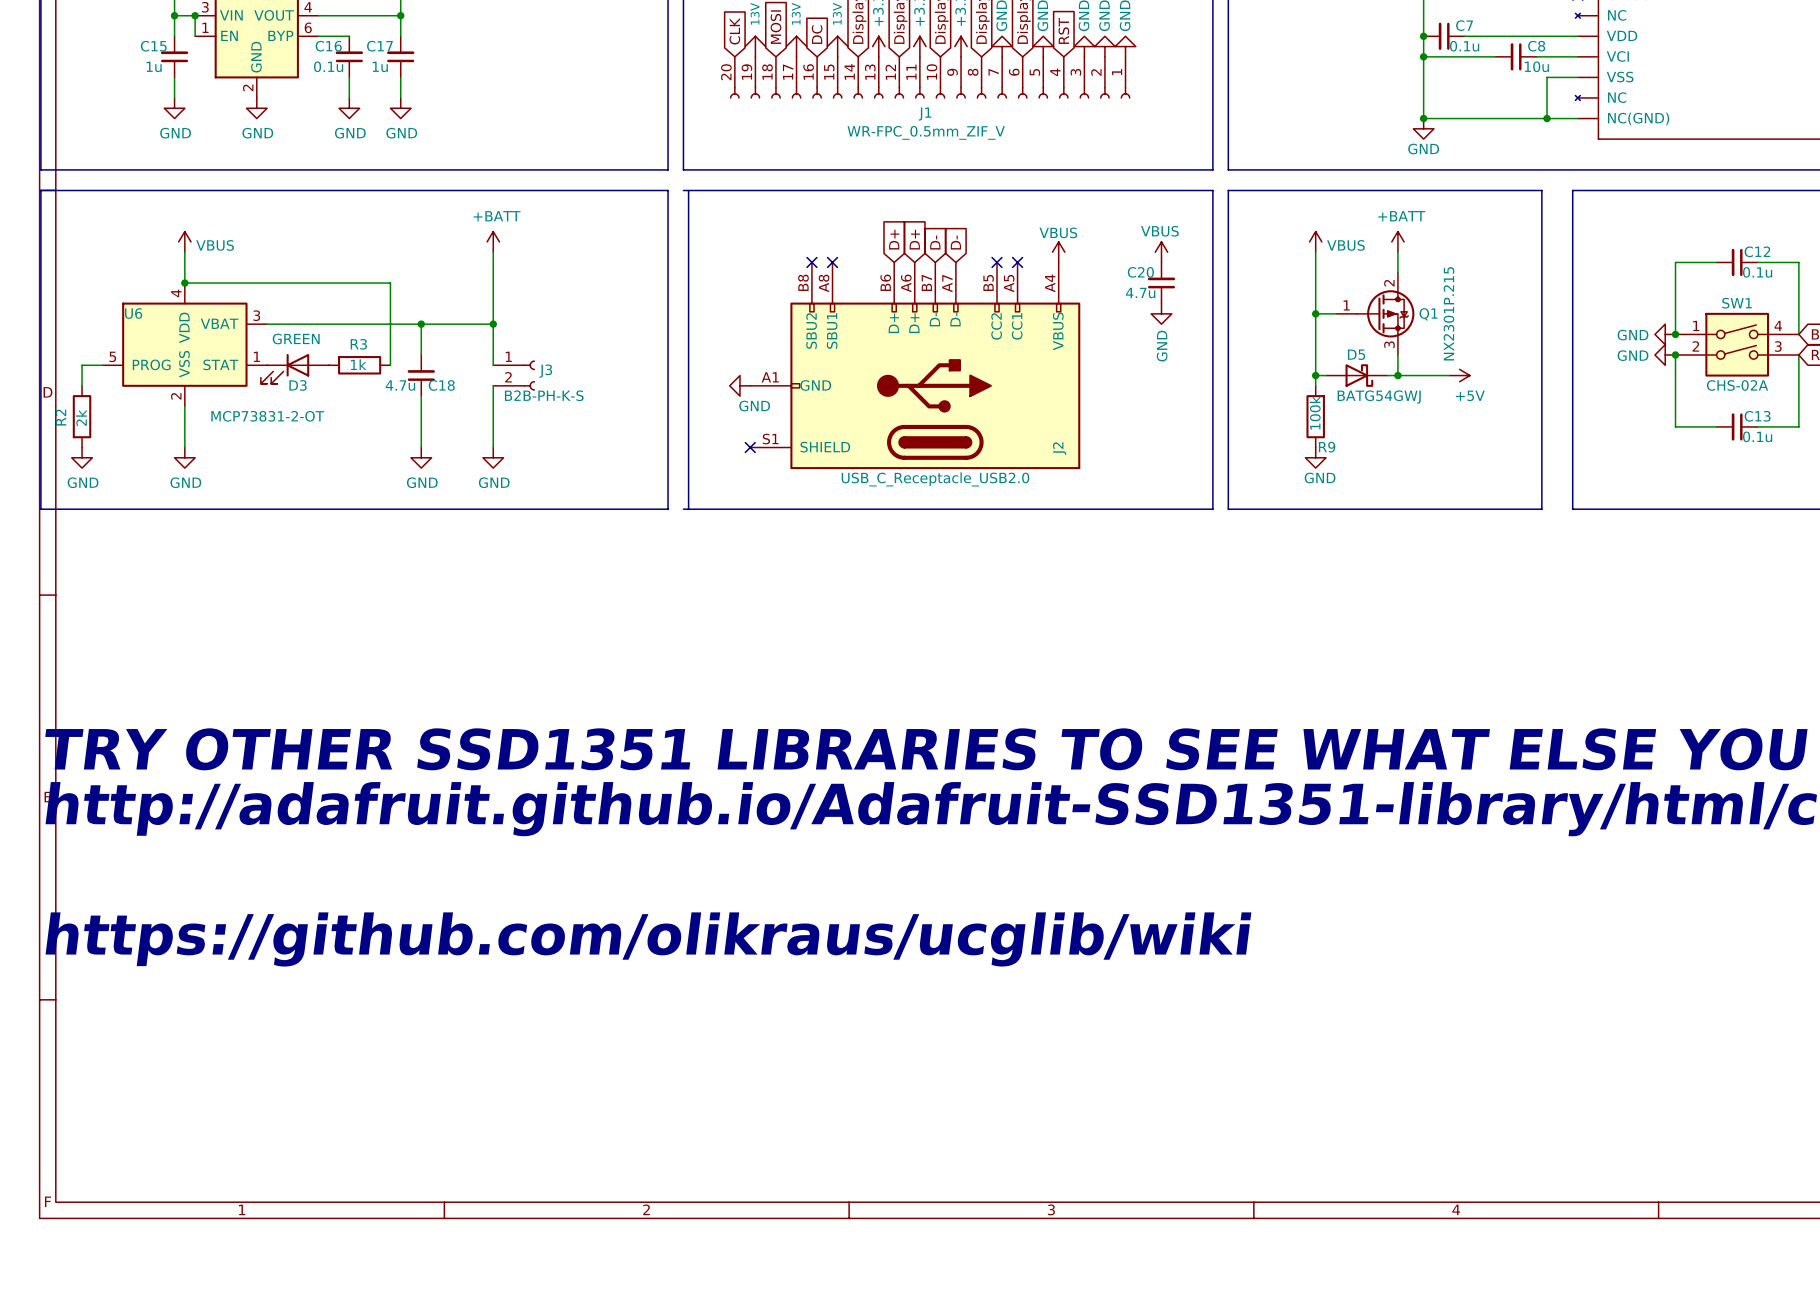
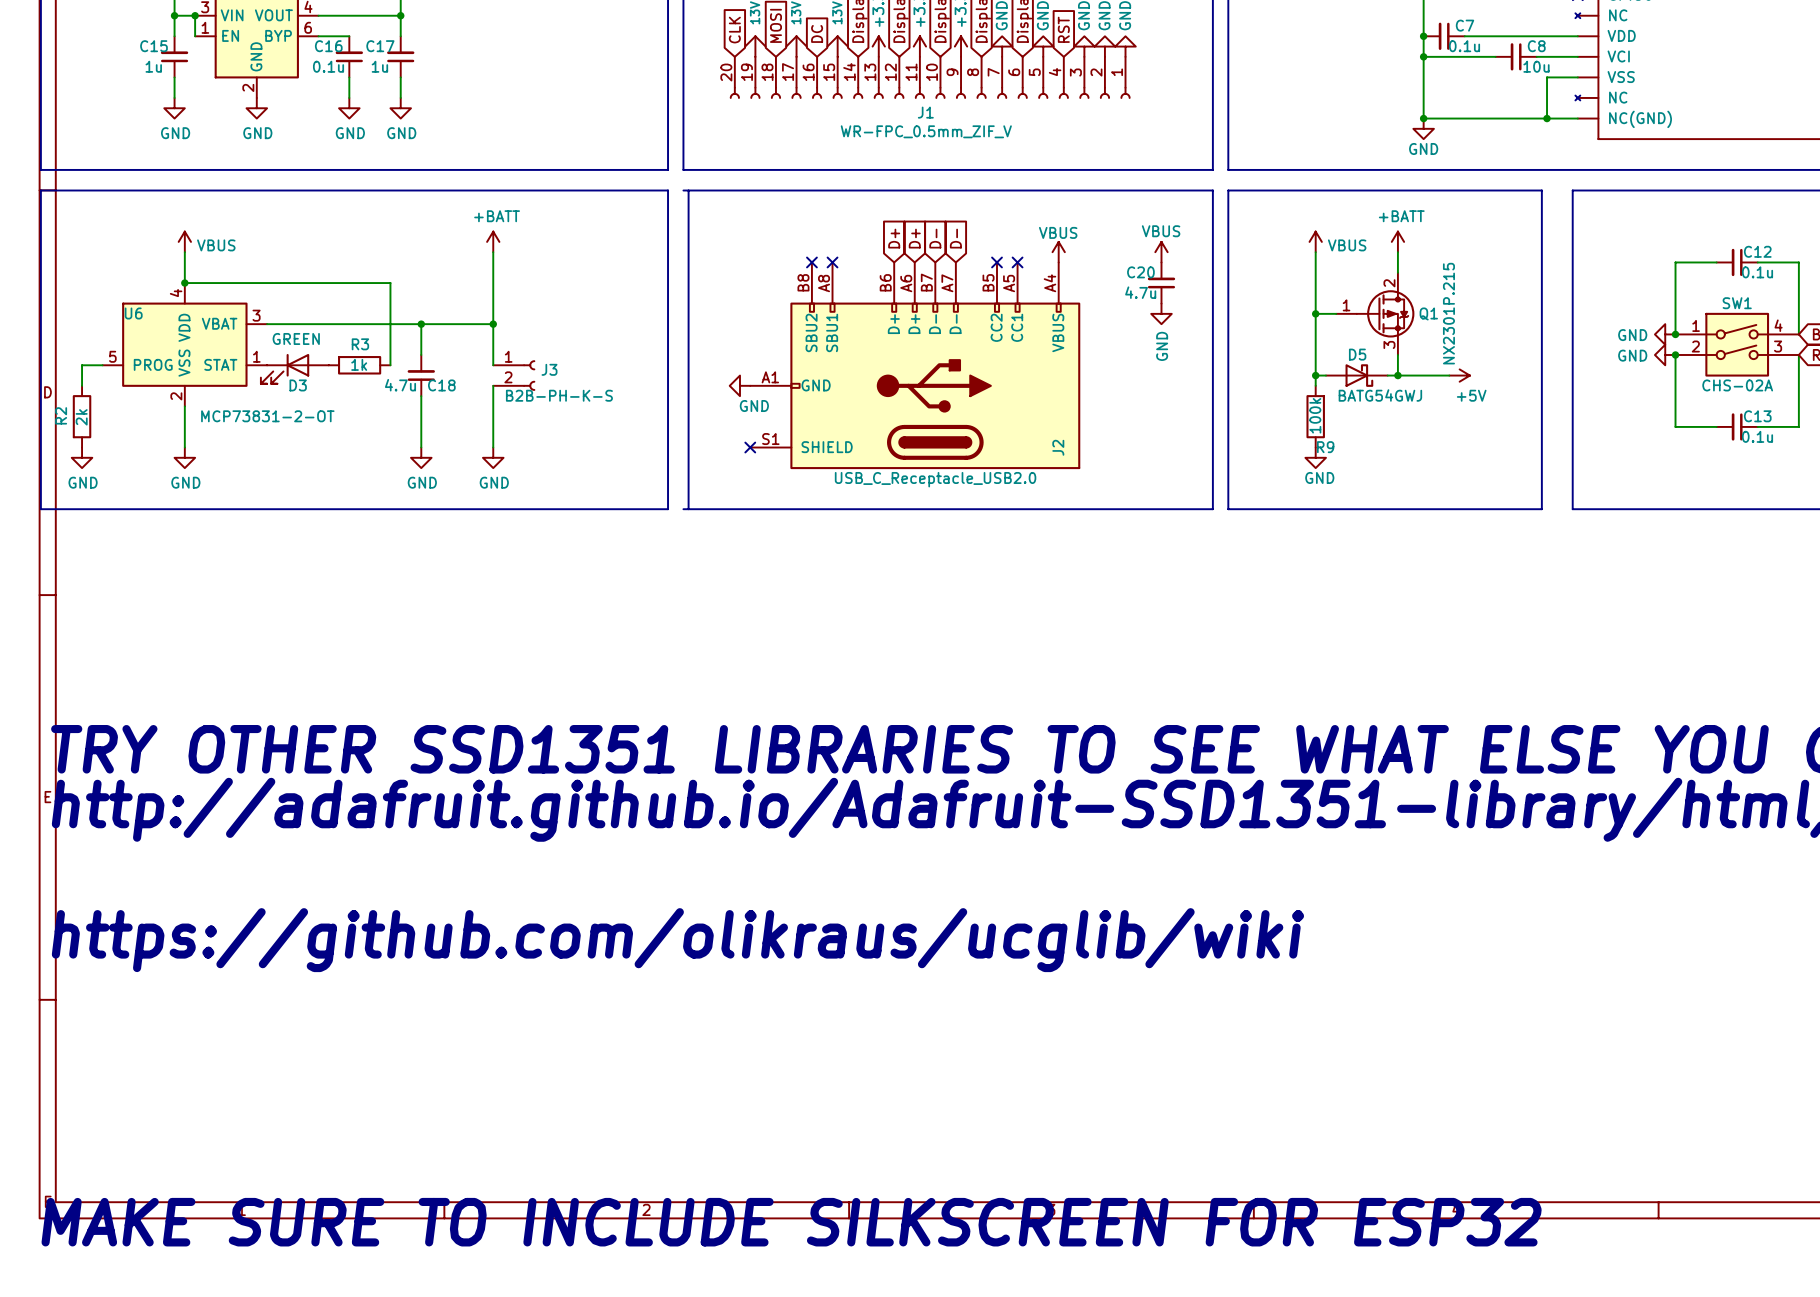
text: none -> MAKE SURE TO INCLUDE SILKSCREEN FOR ESP32 (791, 1222)

